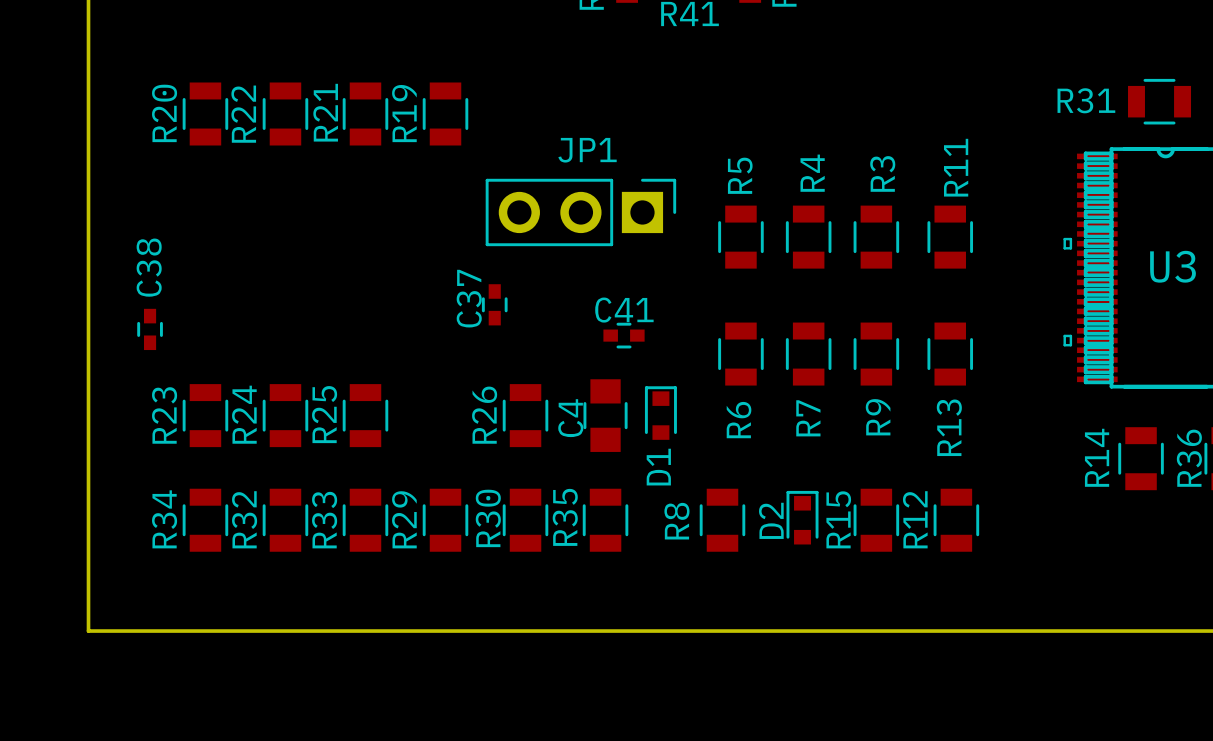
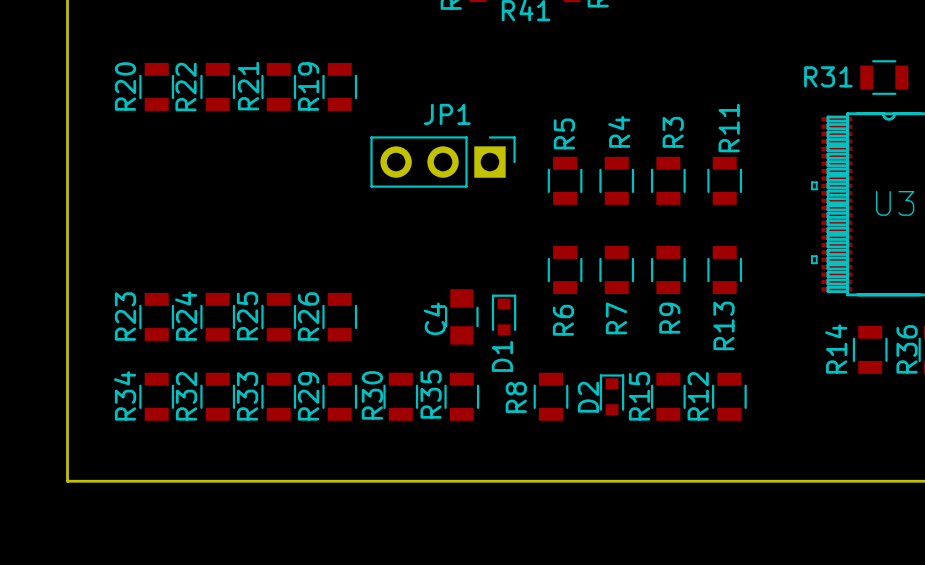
C37: (494, 304) -> none
C38: (150, 329) -> none
C41: (624, 335) -> none
R26 position: (525, 415) -> (339, 316)

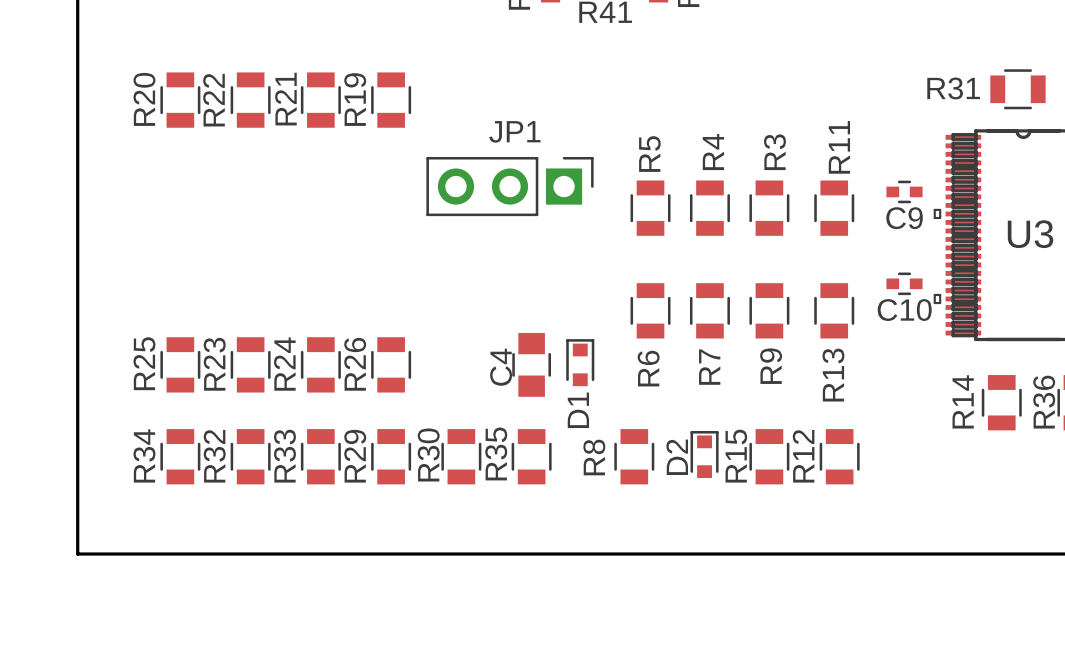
C9: none -> (904, 191)
C10: none -> (904, 283)
R23 name: R23 (125, 316) -> R25 (144, 363)
R24 name: R24 (186, 316) -> R23 (214, 364)
R25 name: R25 (247, 316) -> R24 (284, 364)

